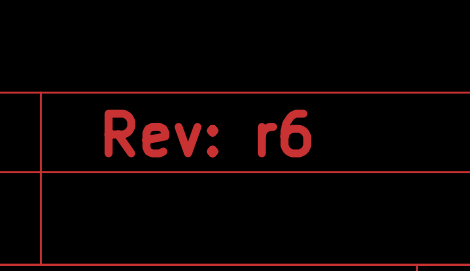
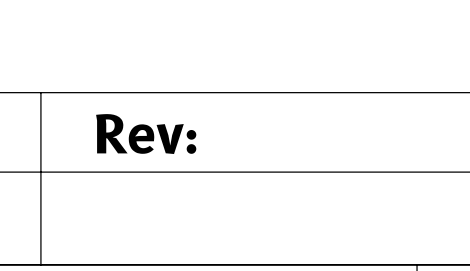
title block: Rev: r6 (207, 133) -> Rev: (146, 134)

